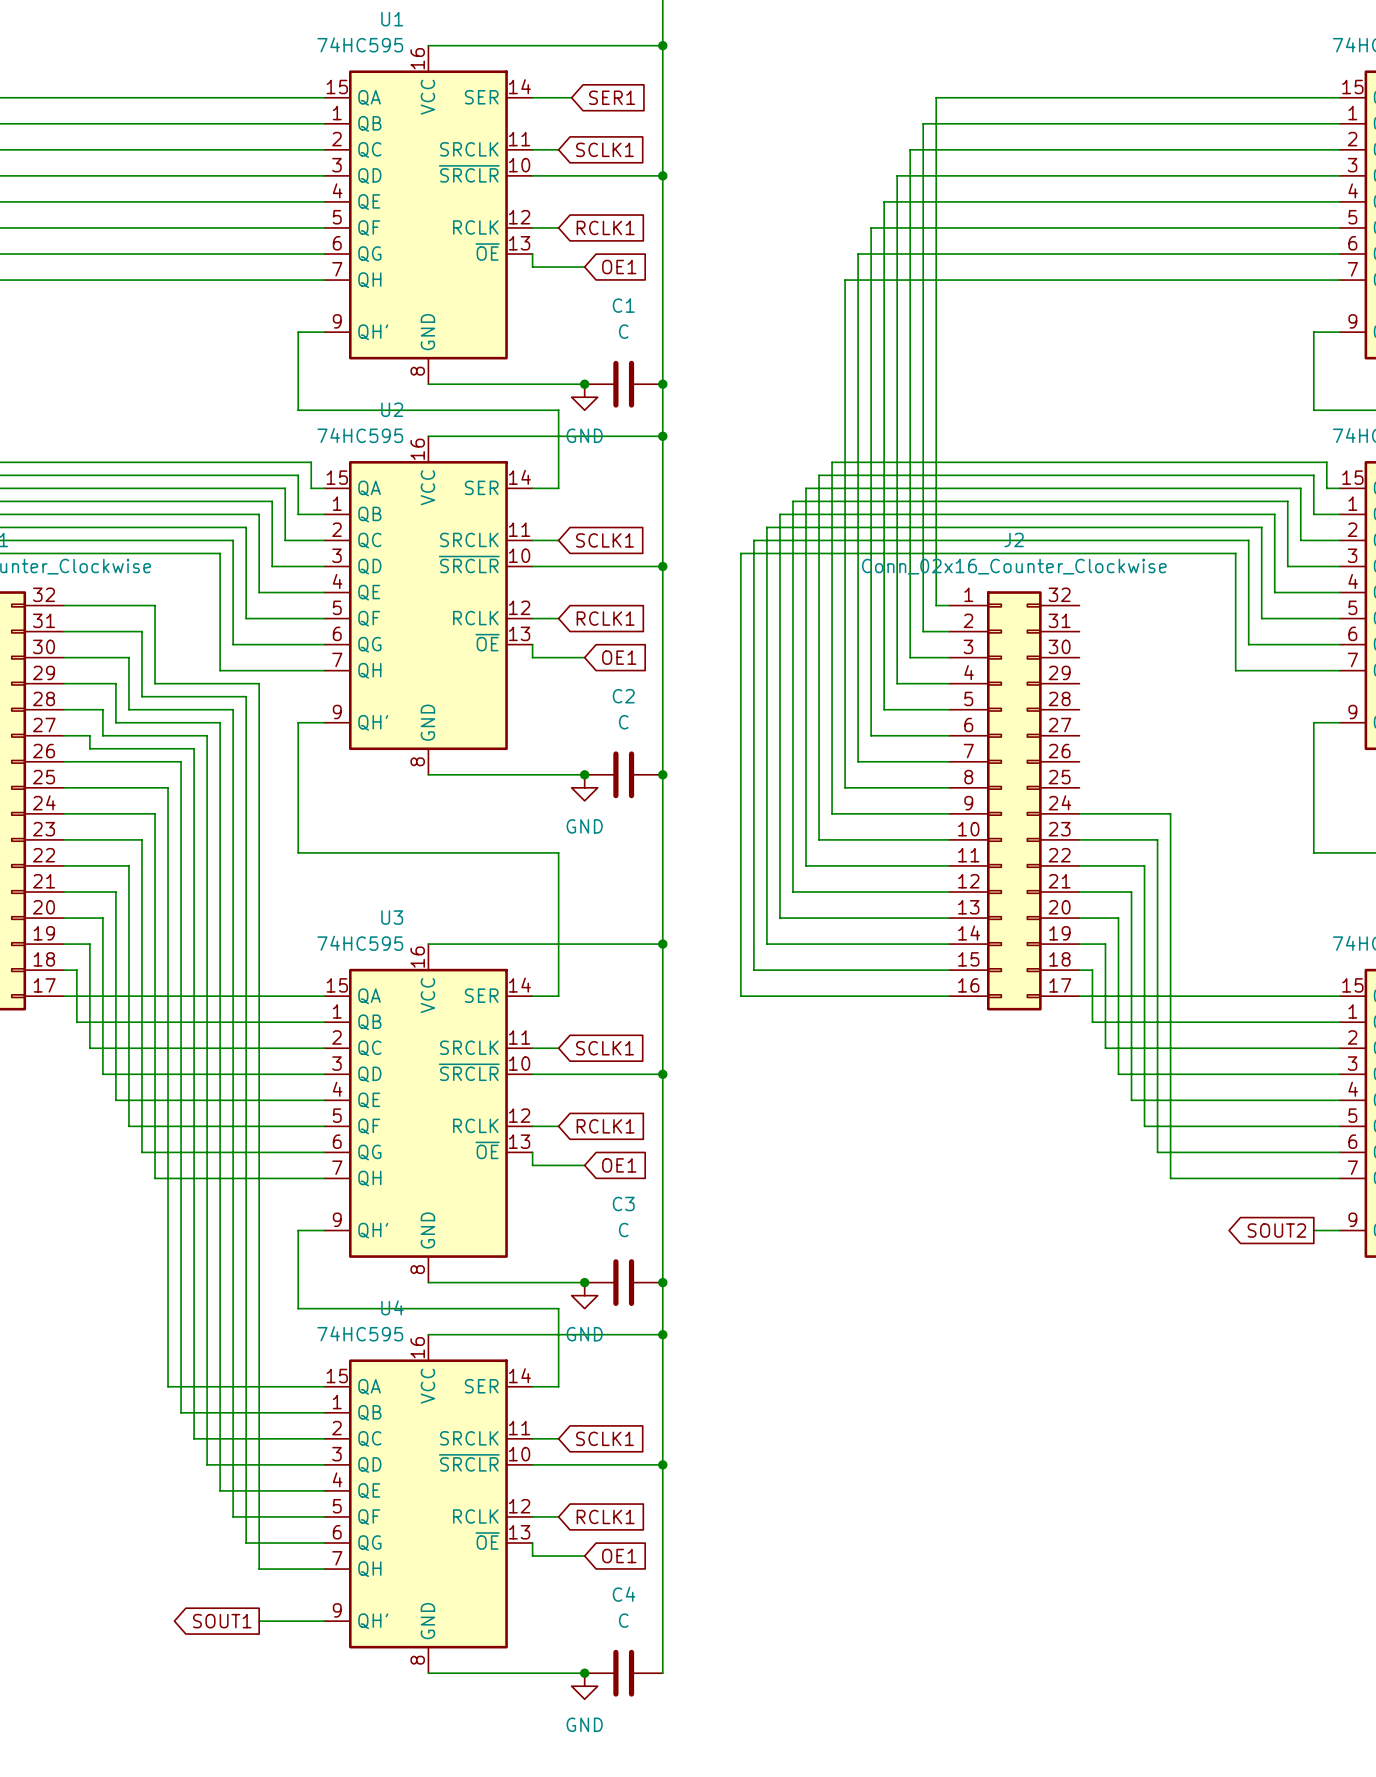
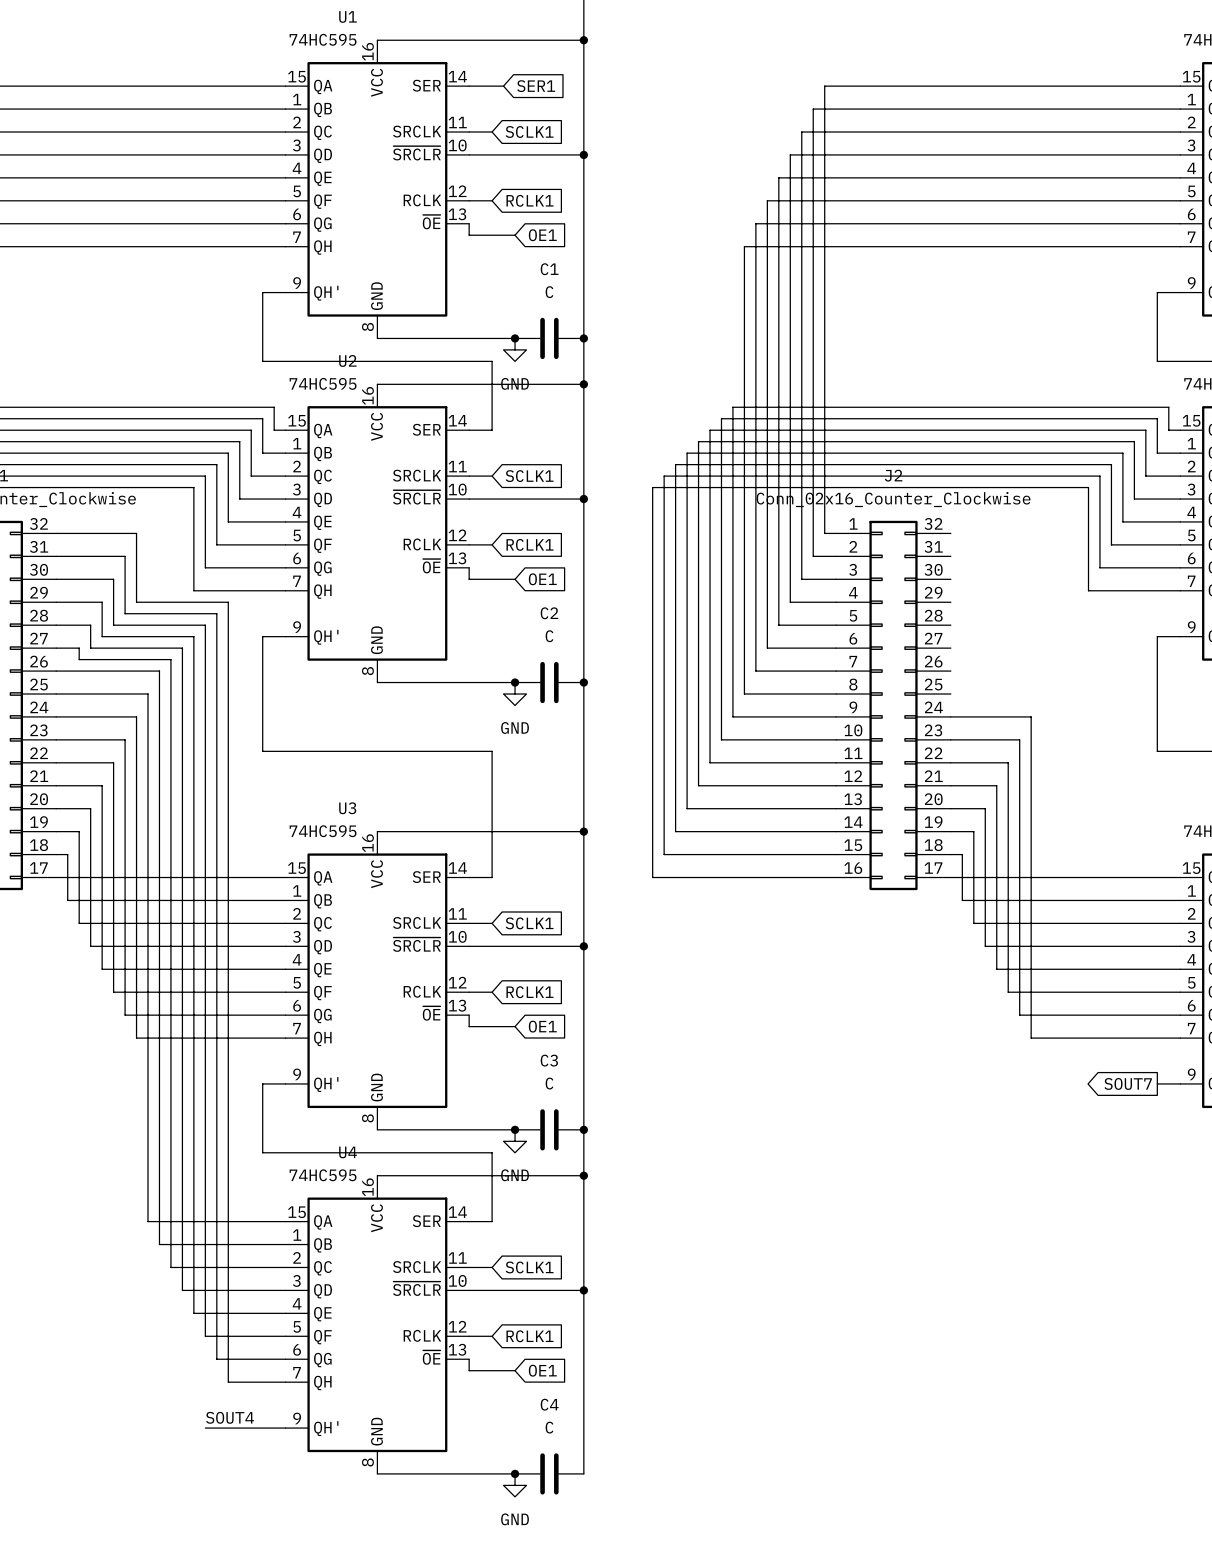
global label: SOUT2 (1276, 1230) -> SOUT7 (1128, 1083)
label: none -> SOUT4 (230, 1417)
global label: SOUT1 (222, 1621) -> none
wire: none -> (205, 1428) (228, 1428)

